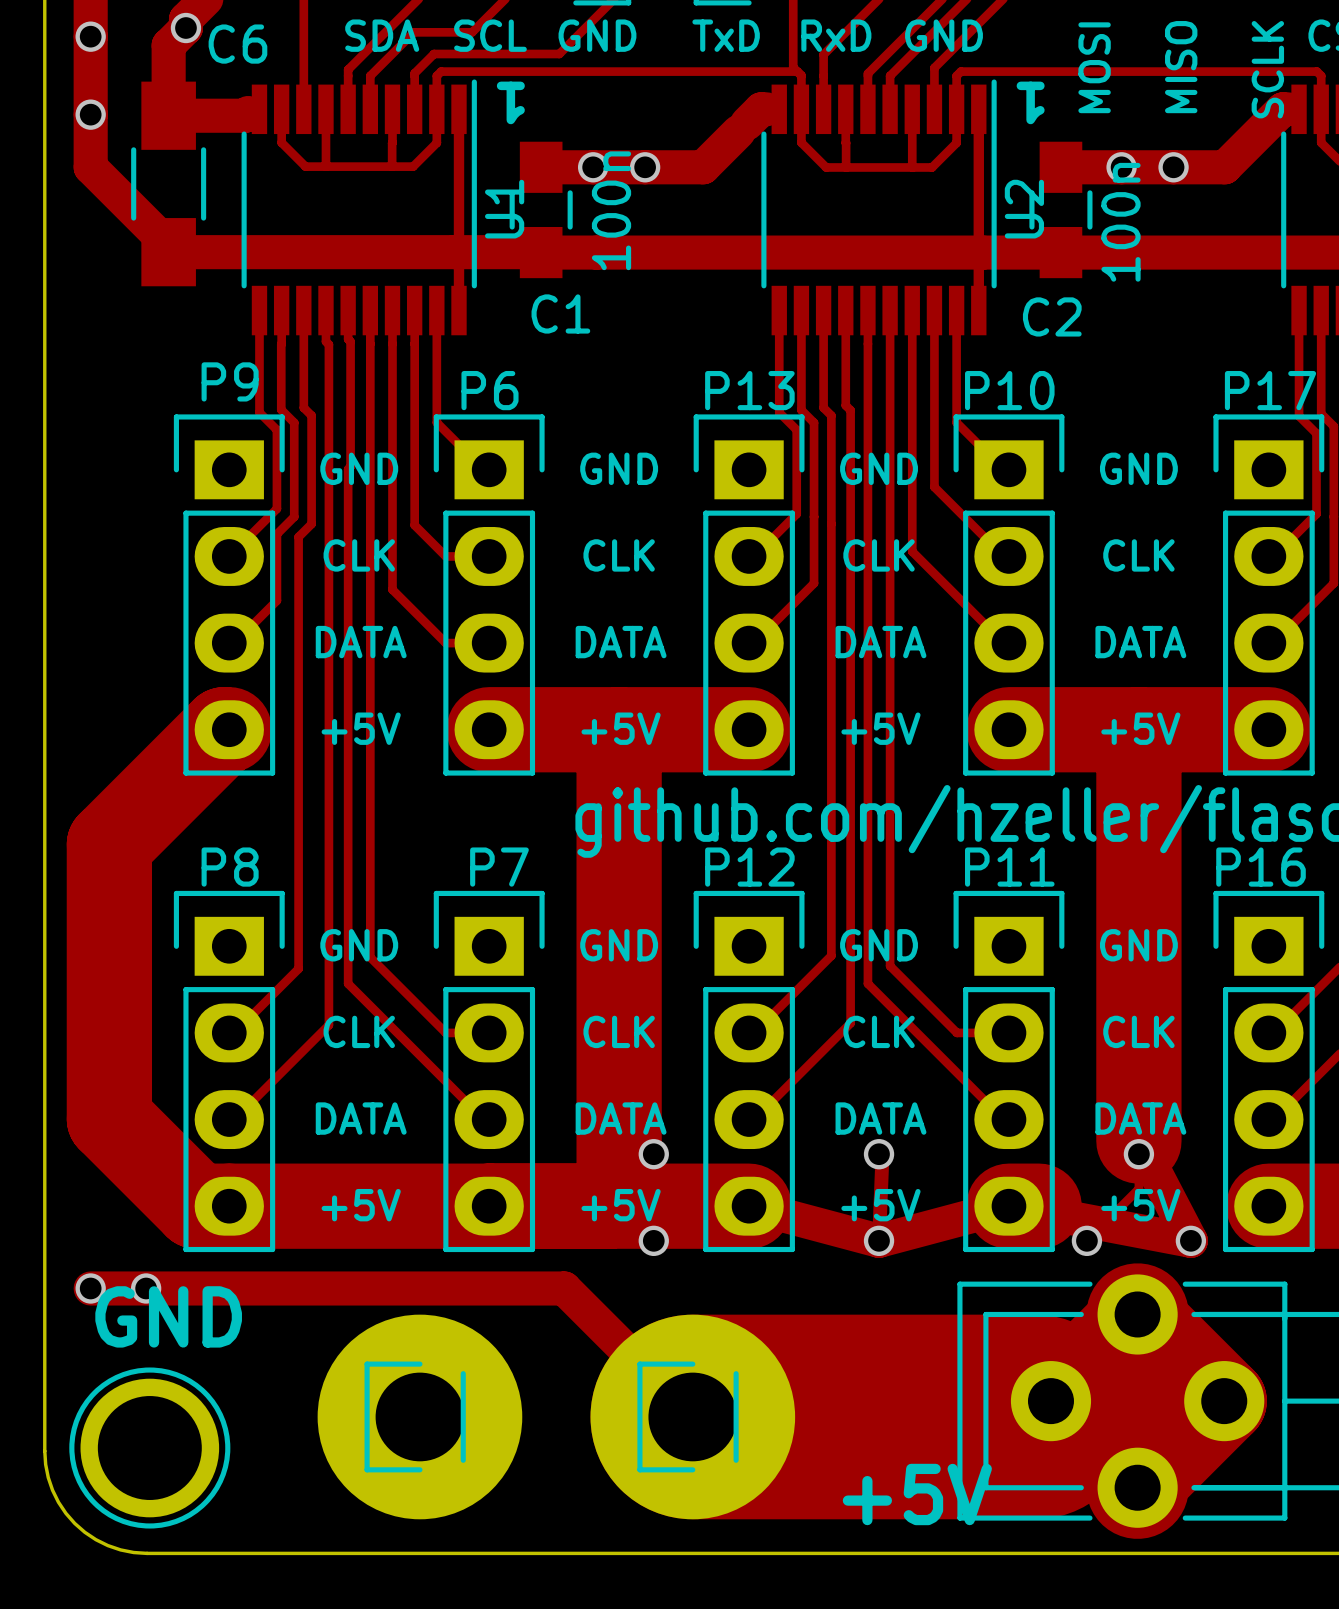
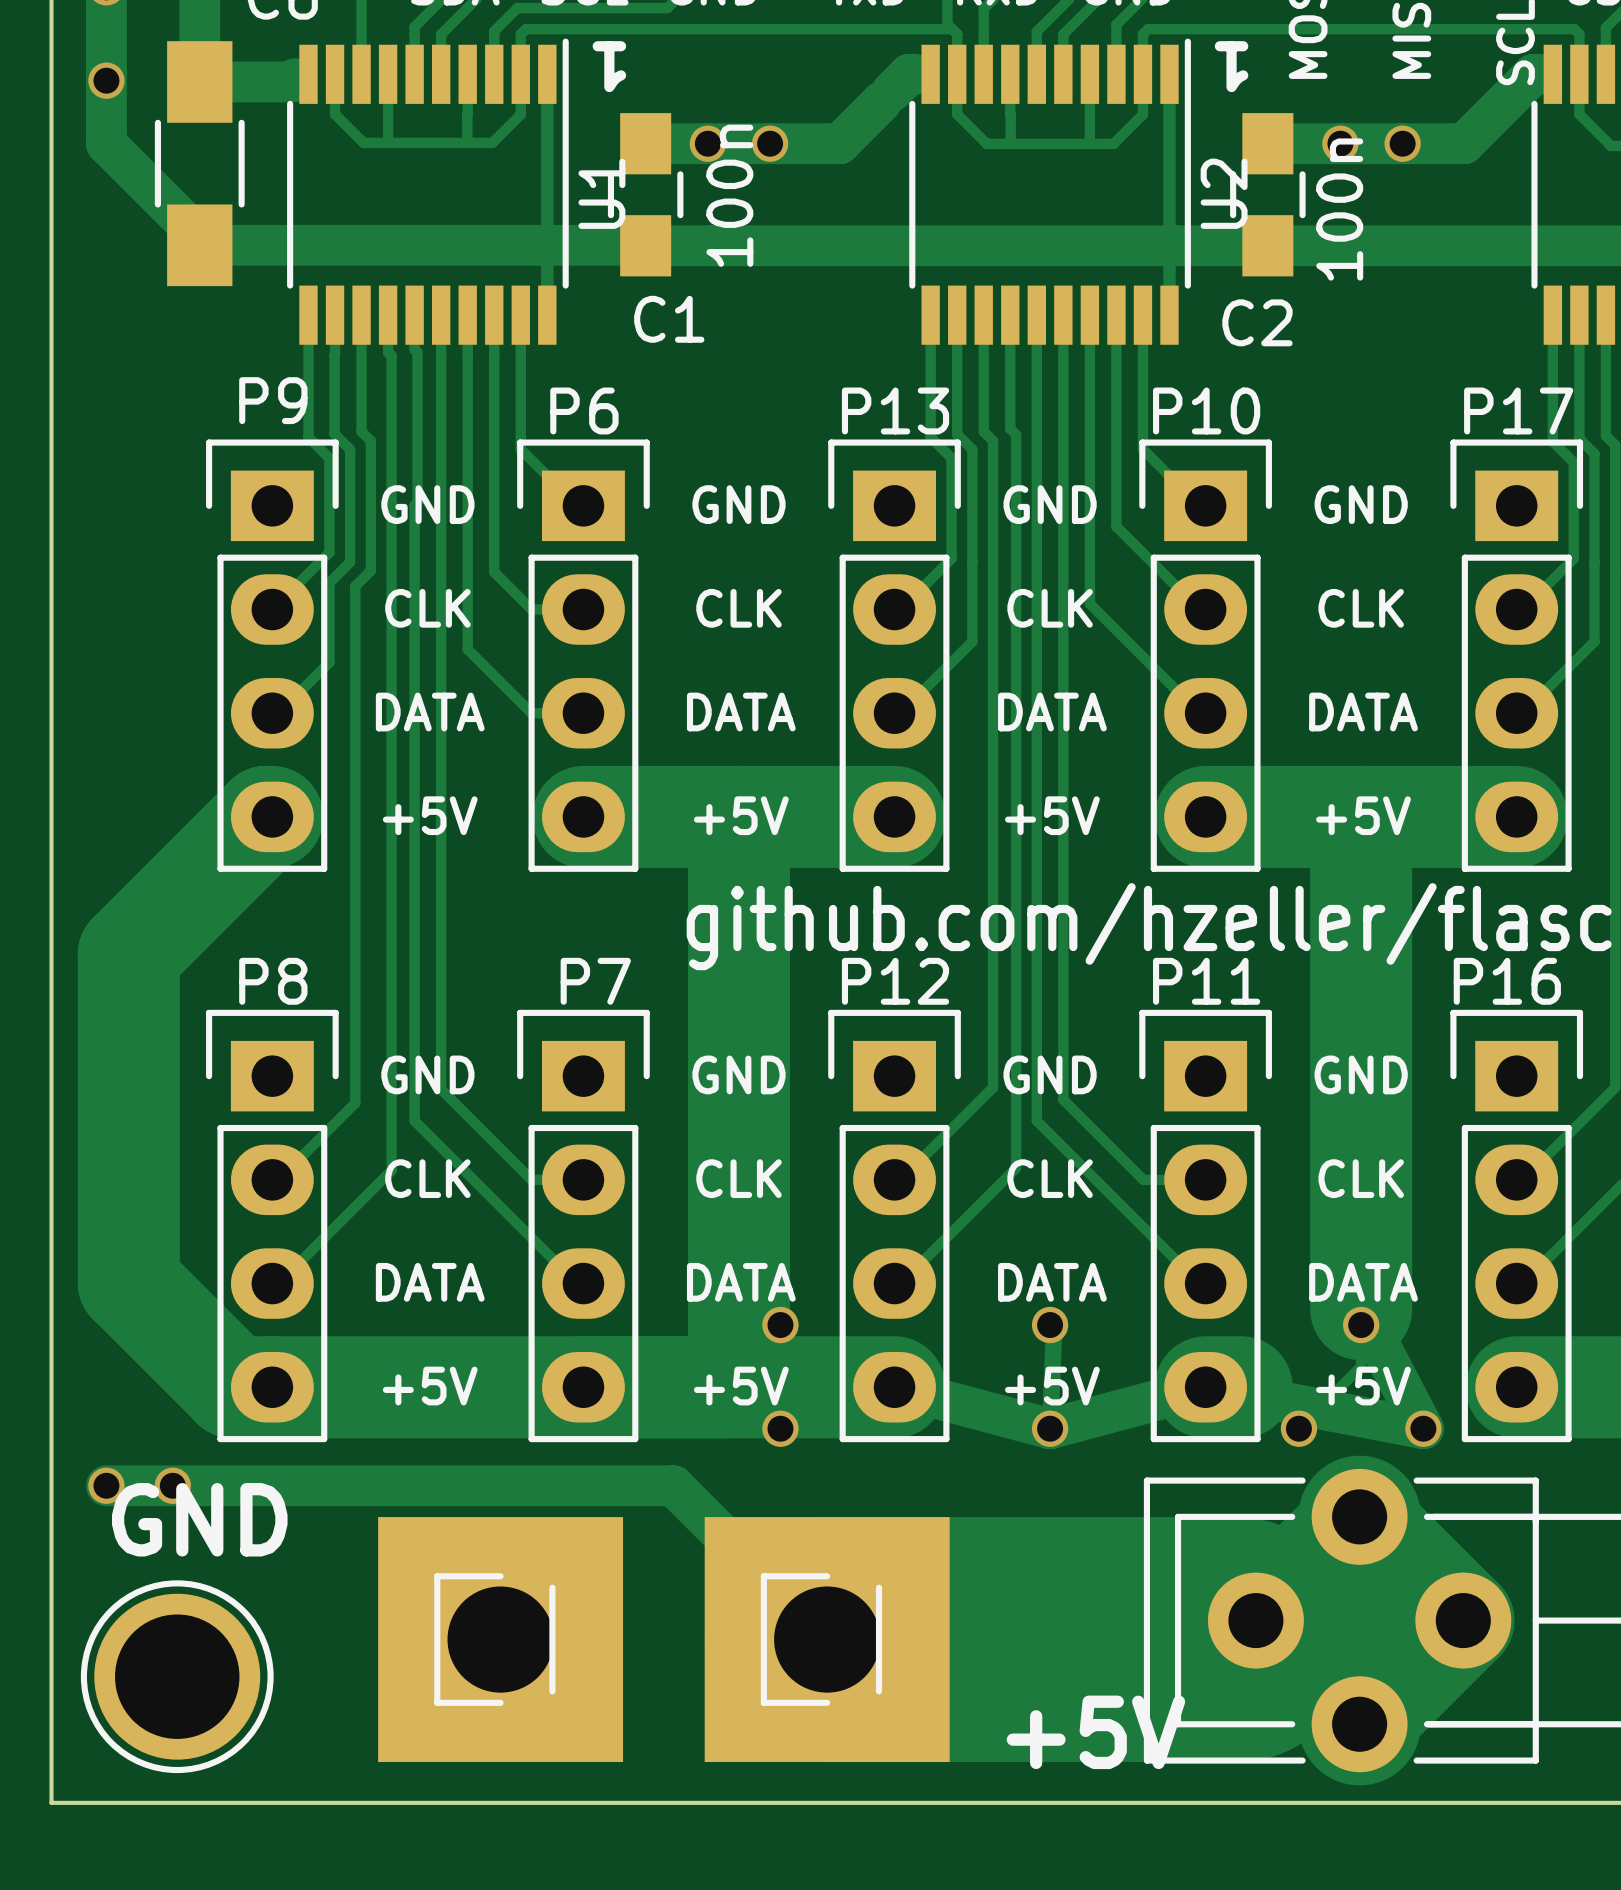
part footprint: [317, 1314, 523, 1520] -> [378, 1517, 624, 1763]
part footprint: [590, 1314, 796, 1520] -> [704, 1517, 950, 1763]
board edge: (44, 1451) (45, 1464) (52, 1490) (58, 1502) (74, 1523) (95, 1539) (107, 1545) (133, 1552) (147, 1553) -> (51, 1680) (51, 1802) (173, 1802)

